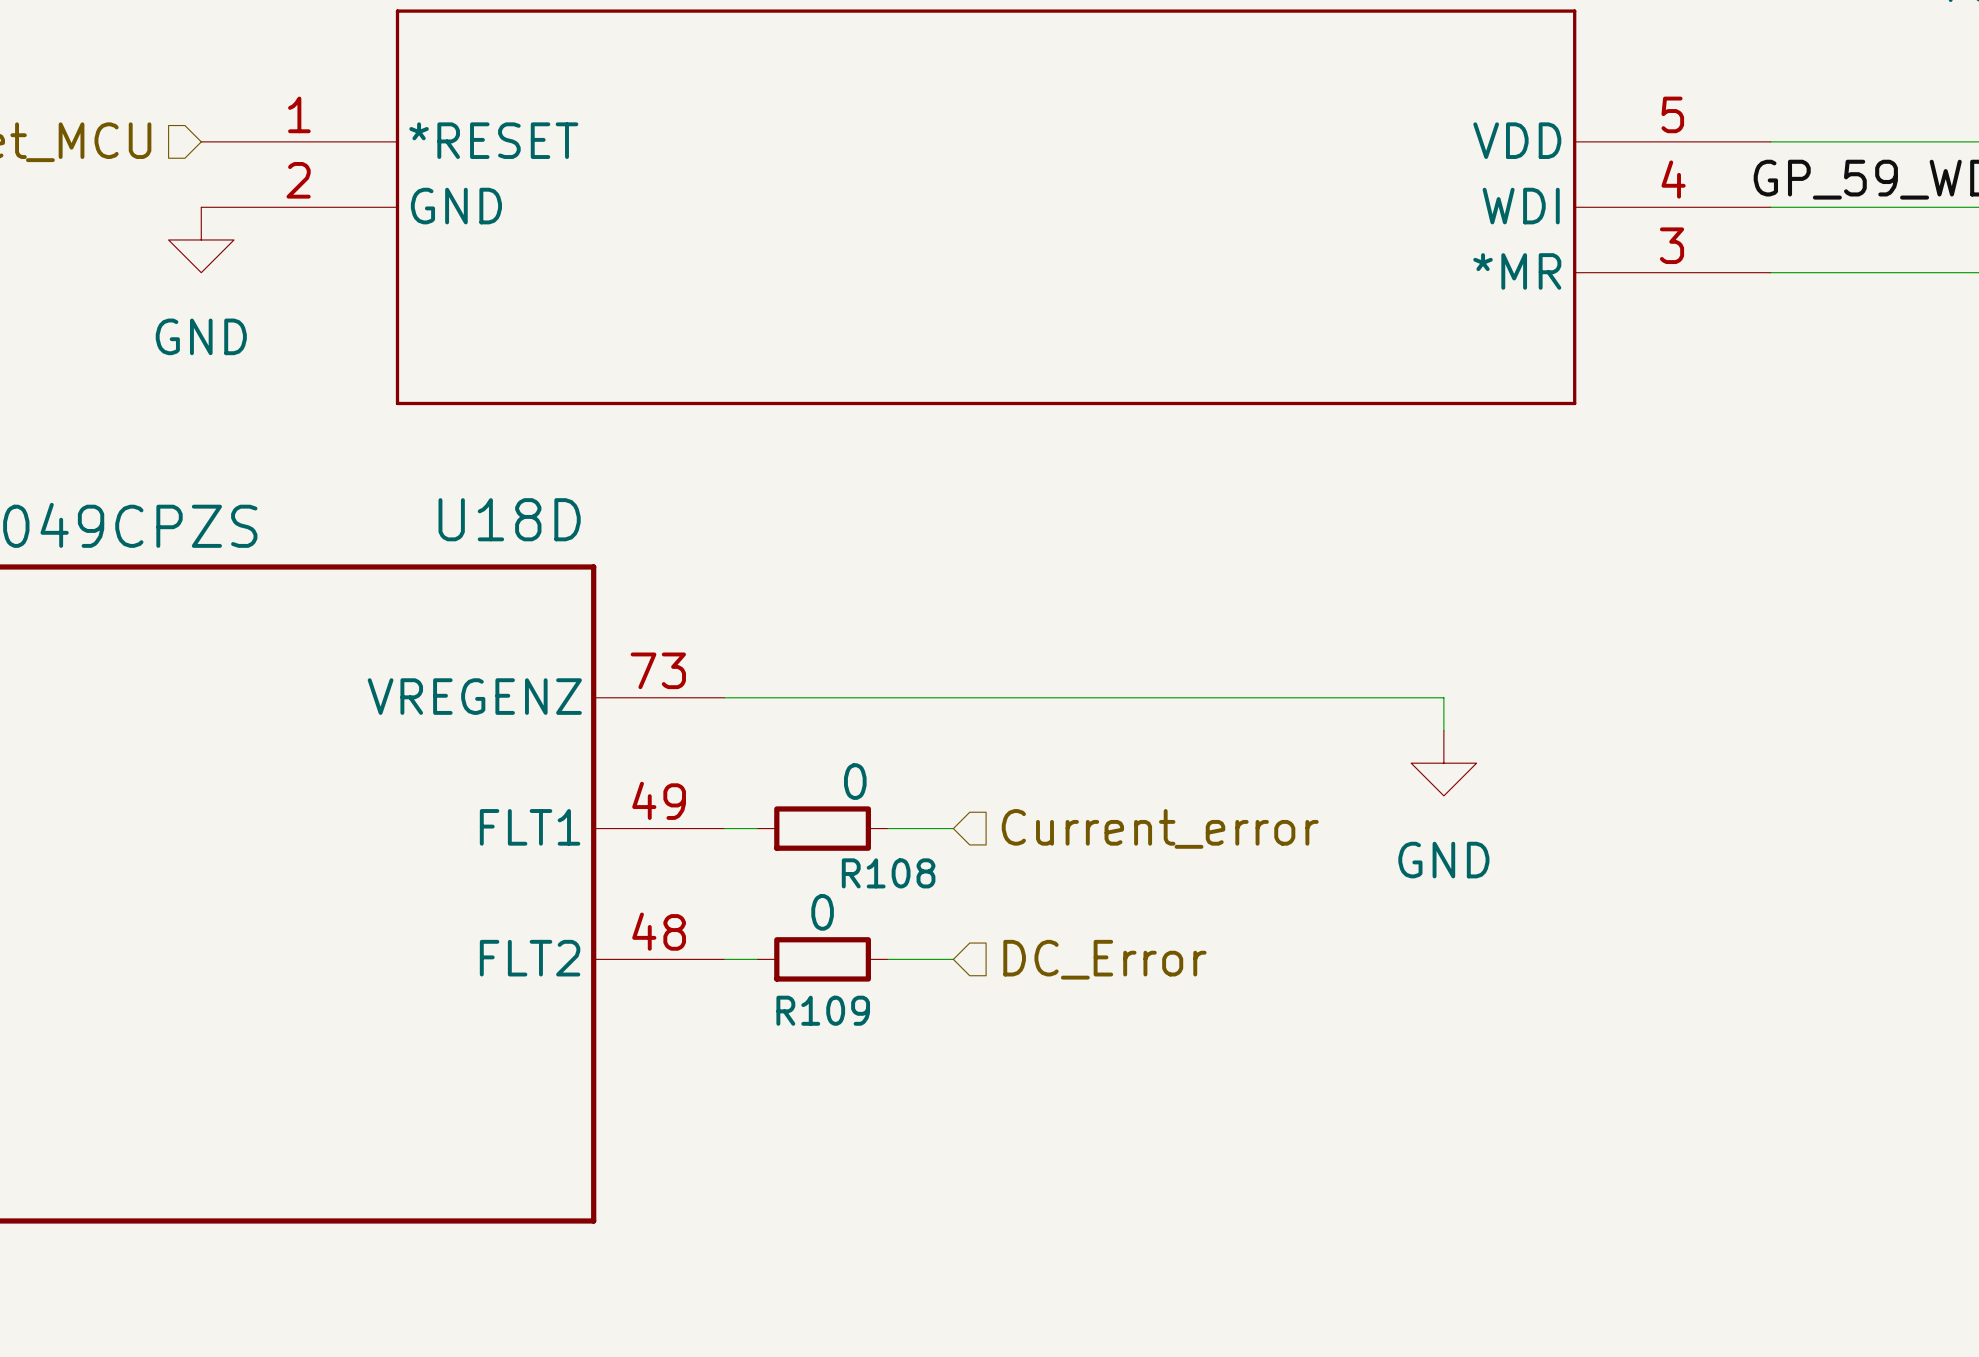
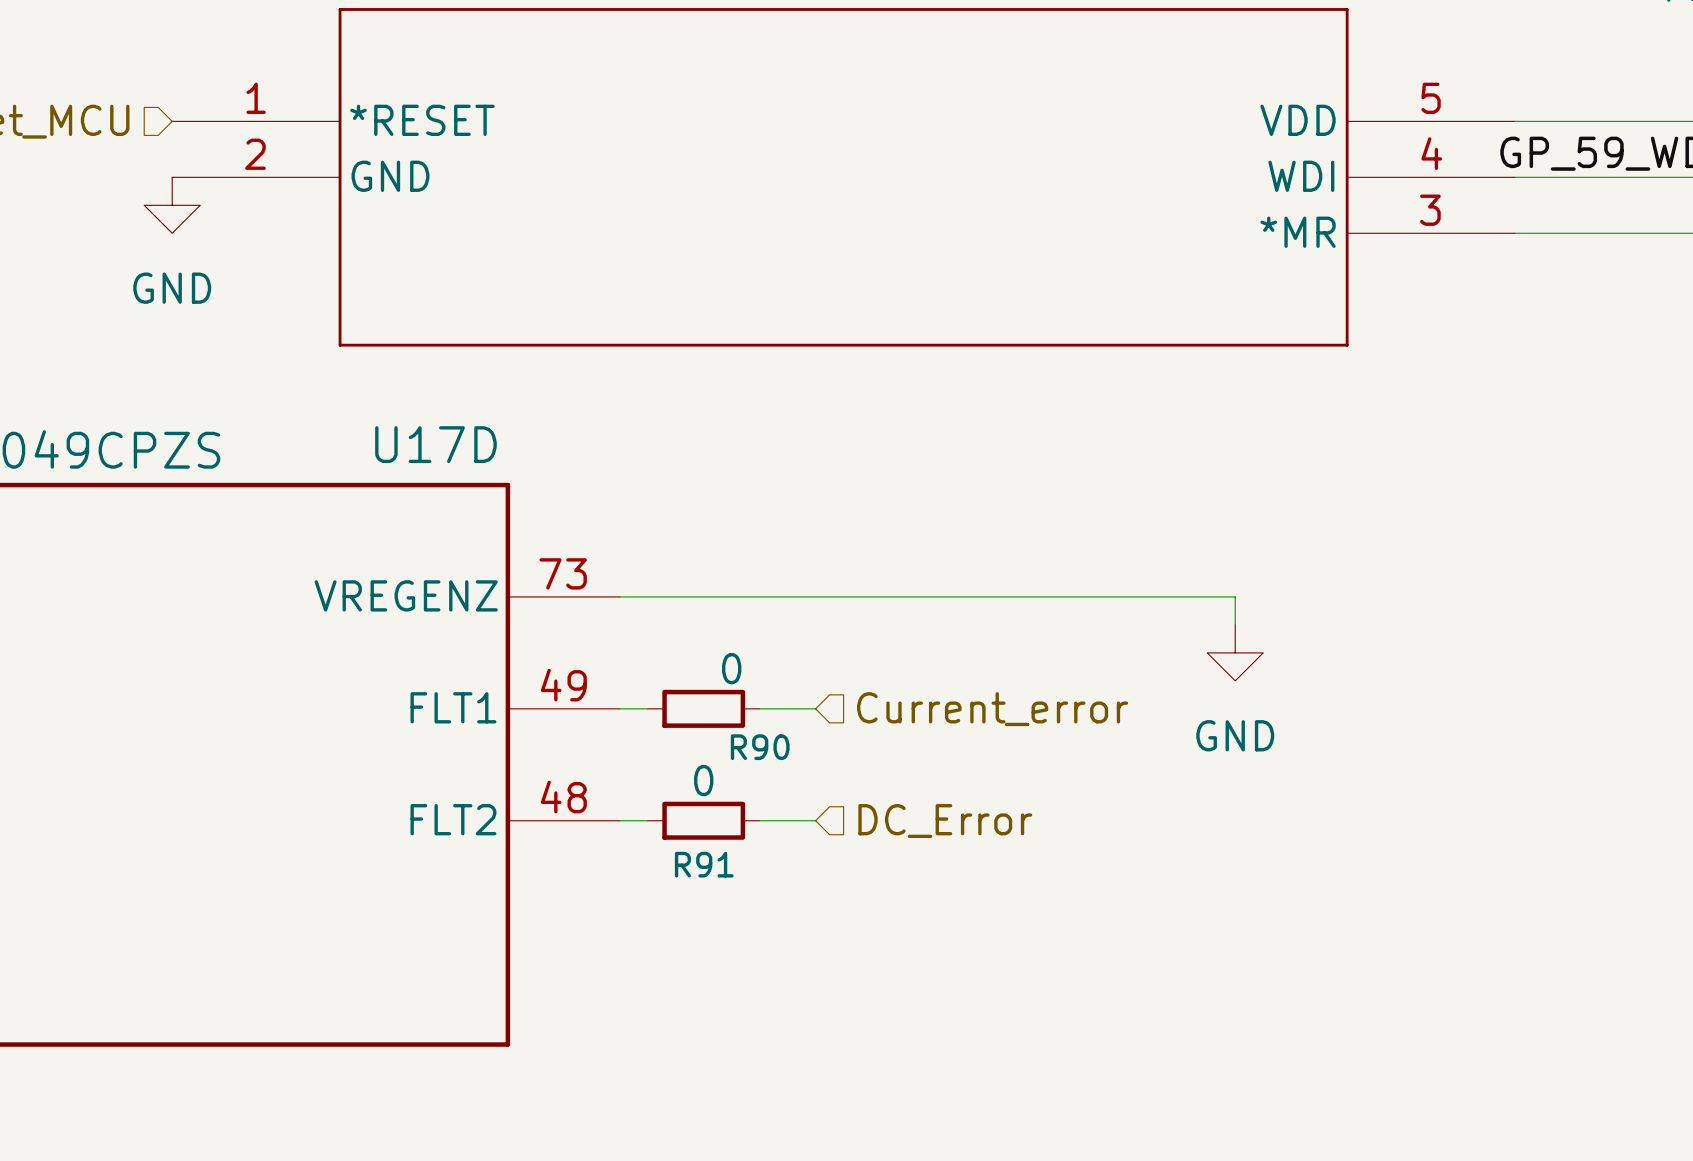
U18D name: U18D (509, 519) -> U17D (435, 444)
R108 name: R108 (888, 873) -> R90 (760, 747)
R109 name: R109 (823, 1010) -> R91 (704, 864)

